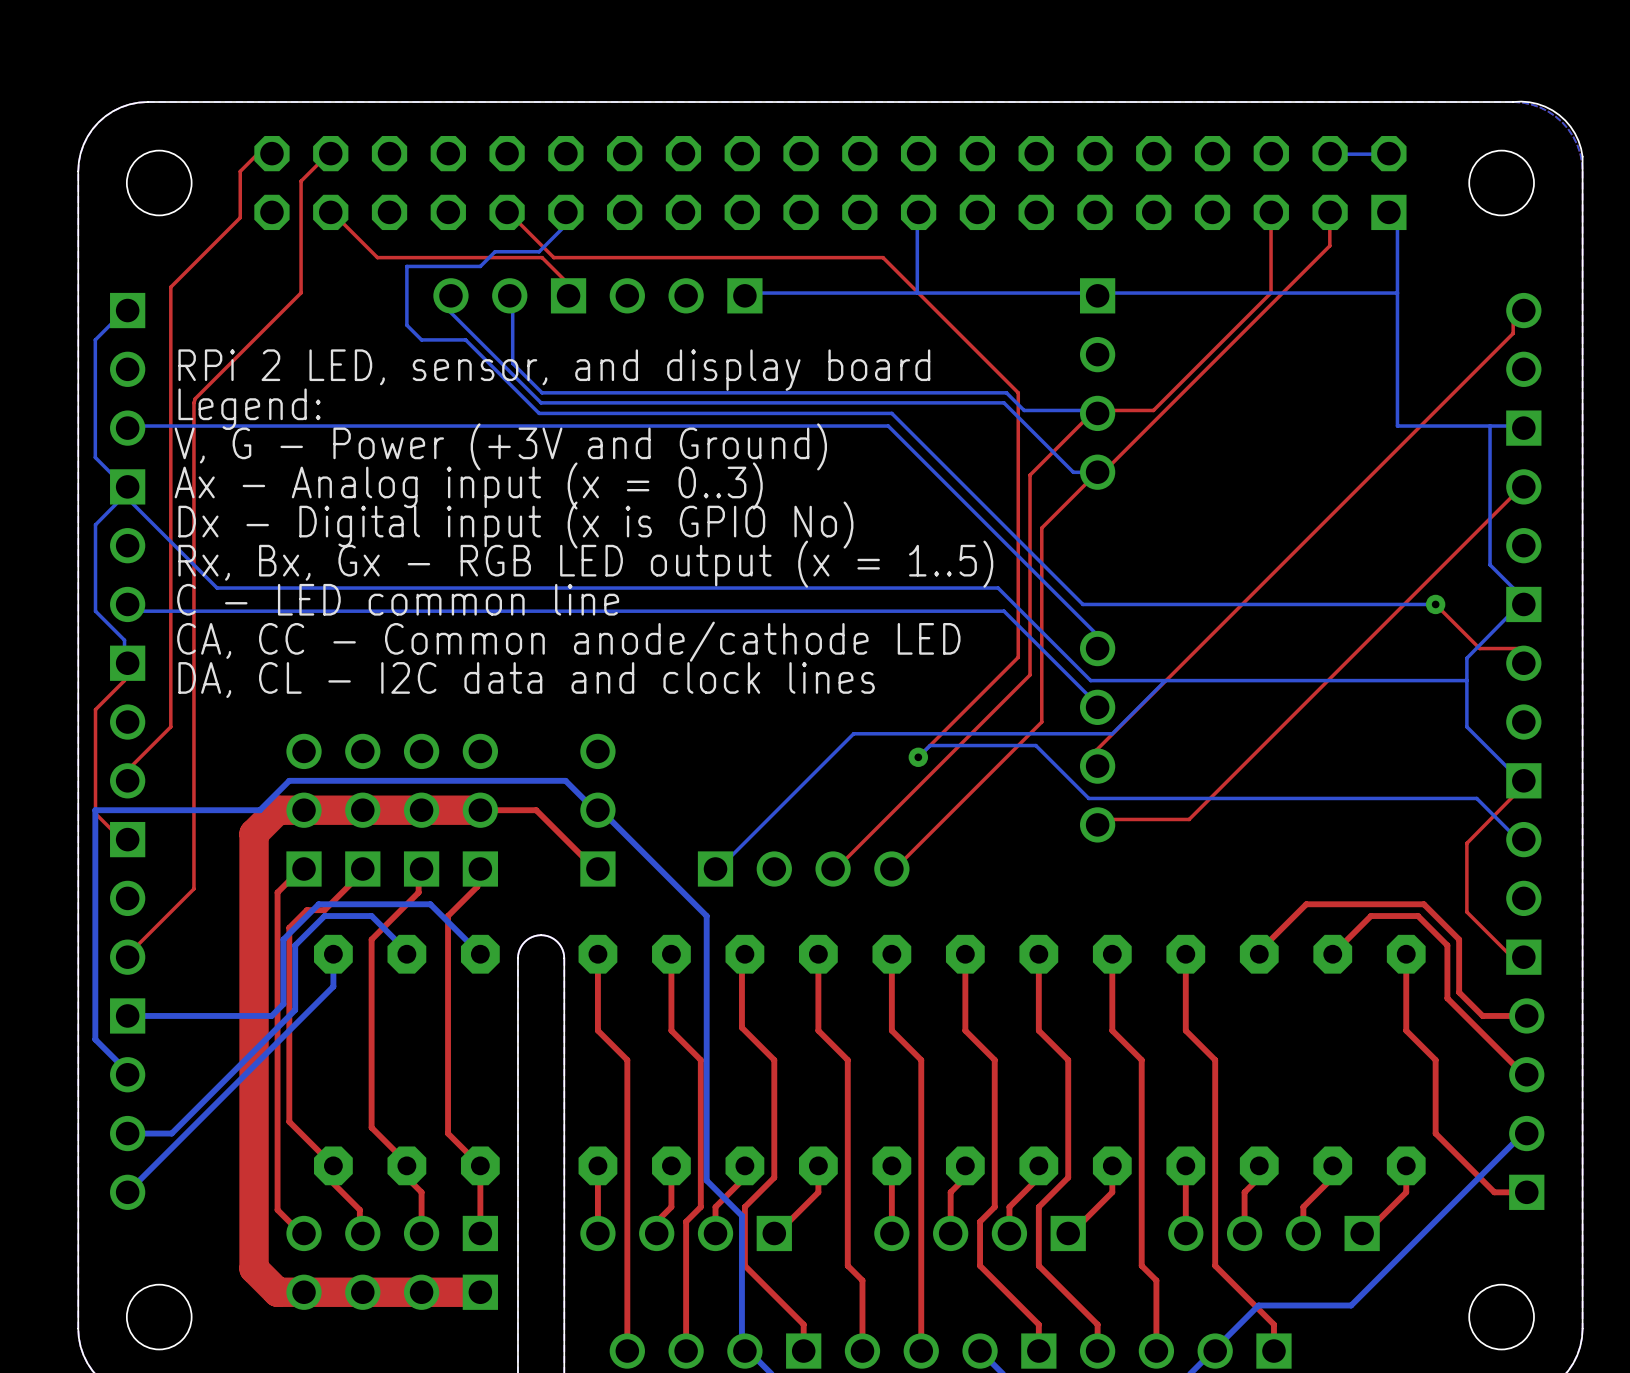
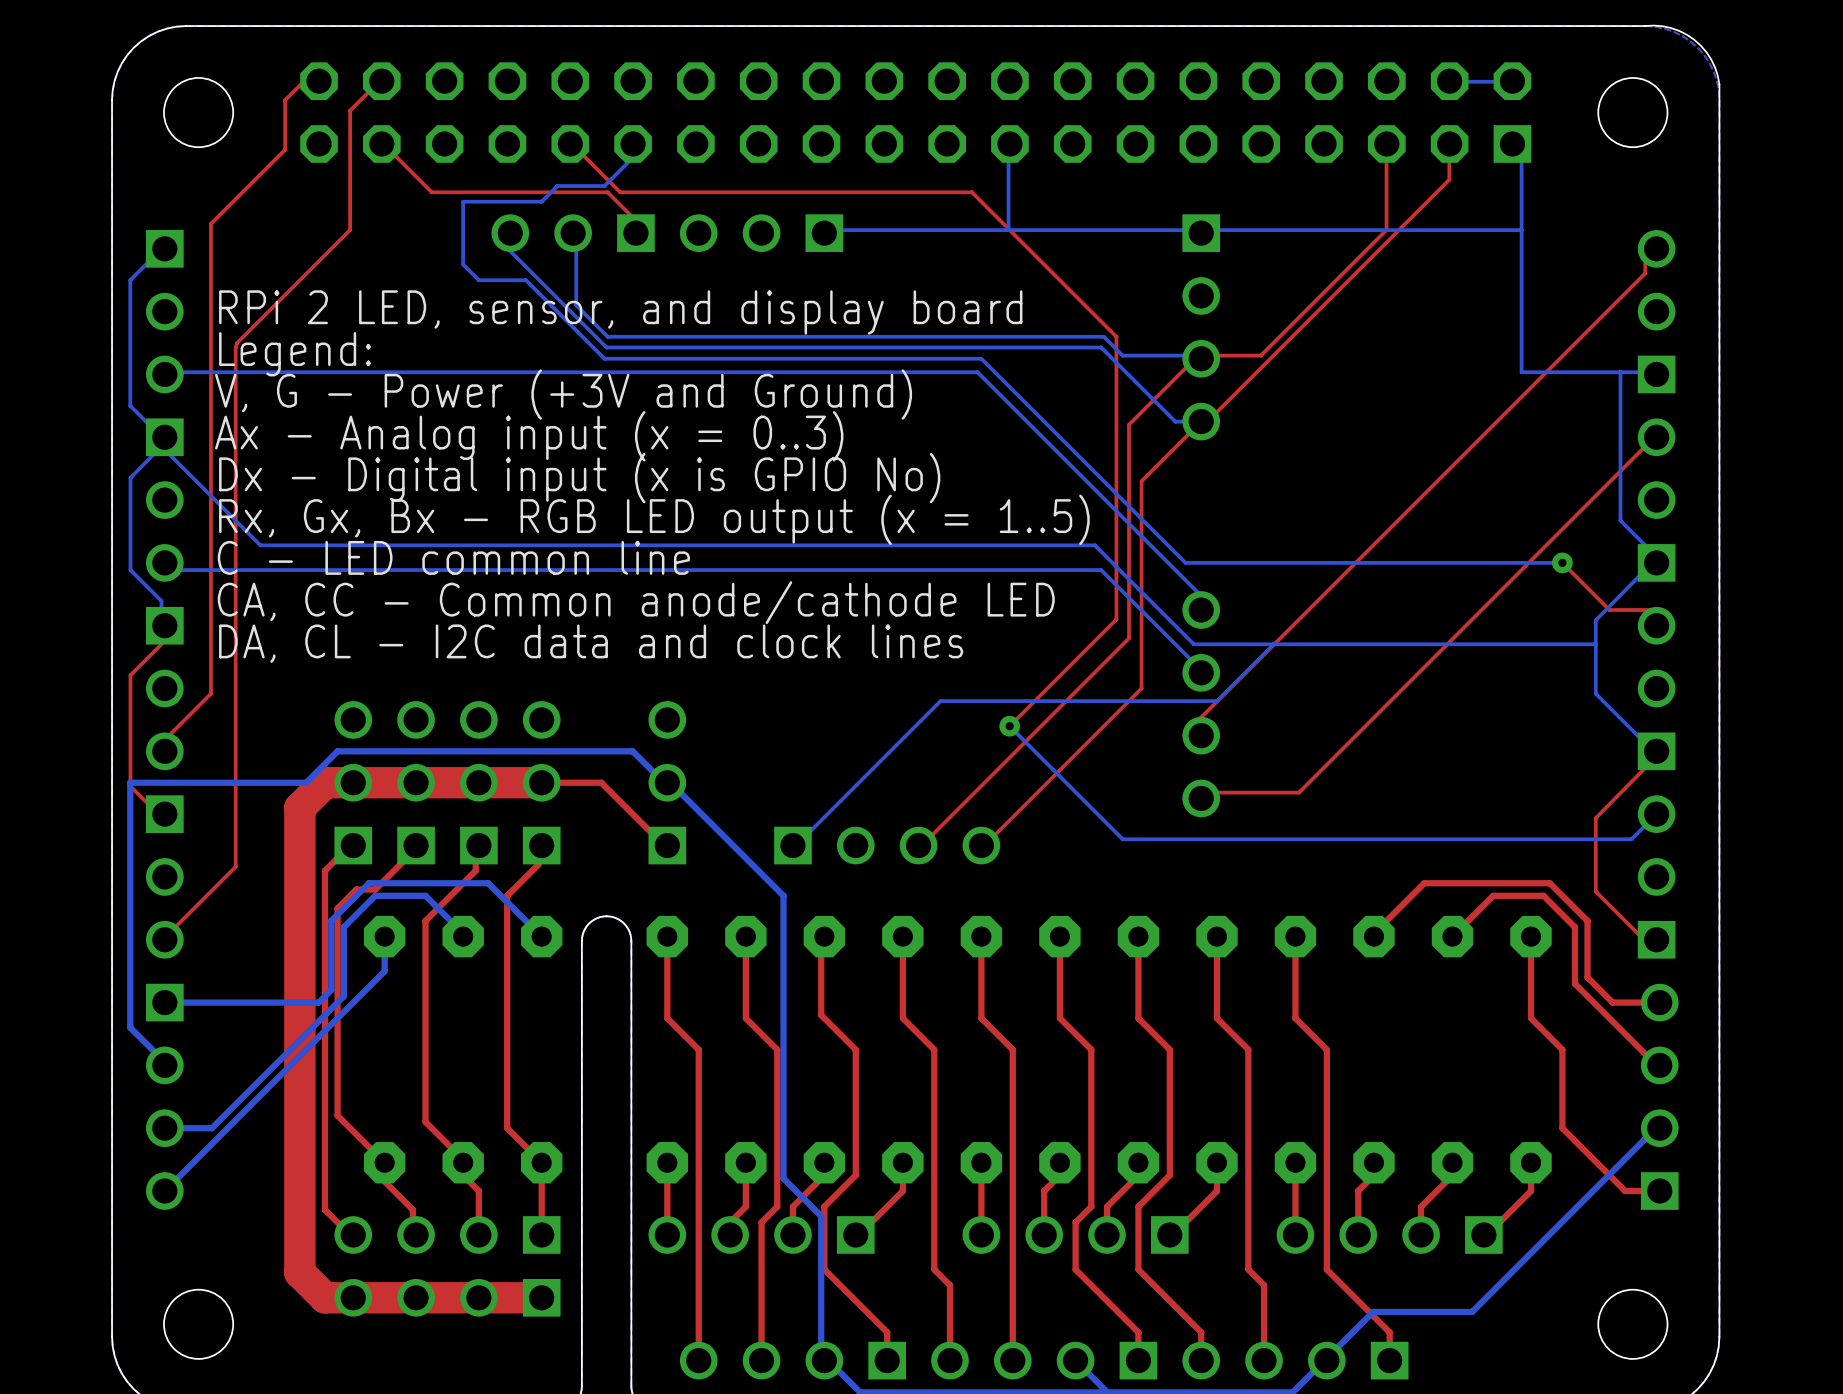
text: Rx, Bx, Gx - RGB LED output (x = 1..5) (585, 564) -> Rx, Gx, Bx - RGB LED output (x = 1..5) (654, 519)
bottom track: (918, 757) (930, 745) (1035, 745) (1088, 798) (1476, 798) (1517, 839) (1523, 839) -> (1009, 726) (1122, 839) (1631, 839) (1656, 814)

